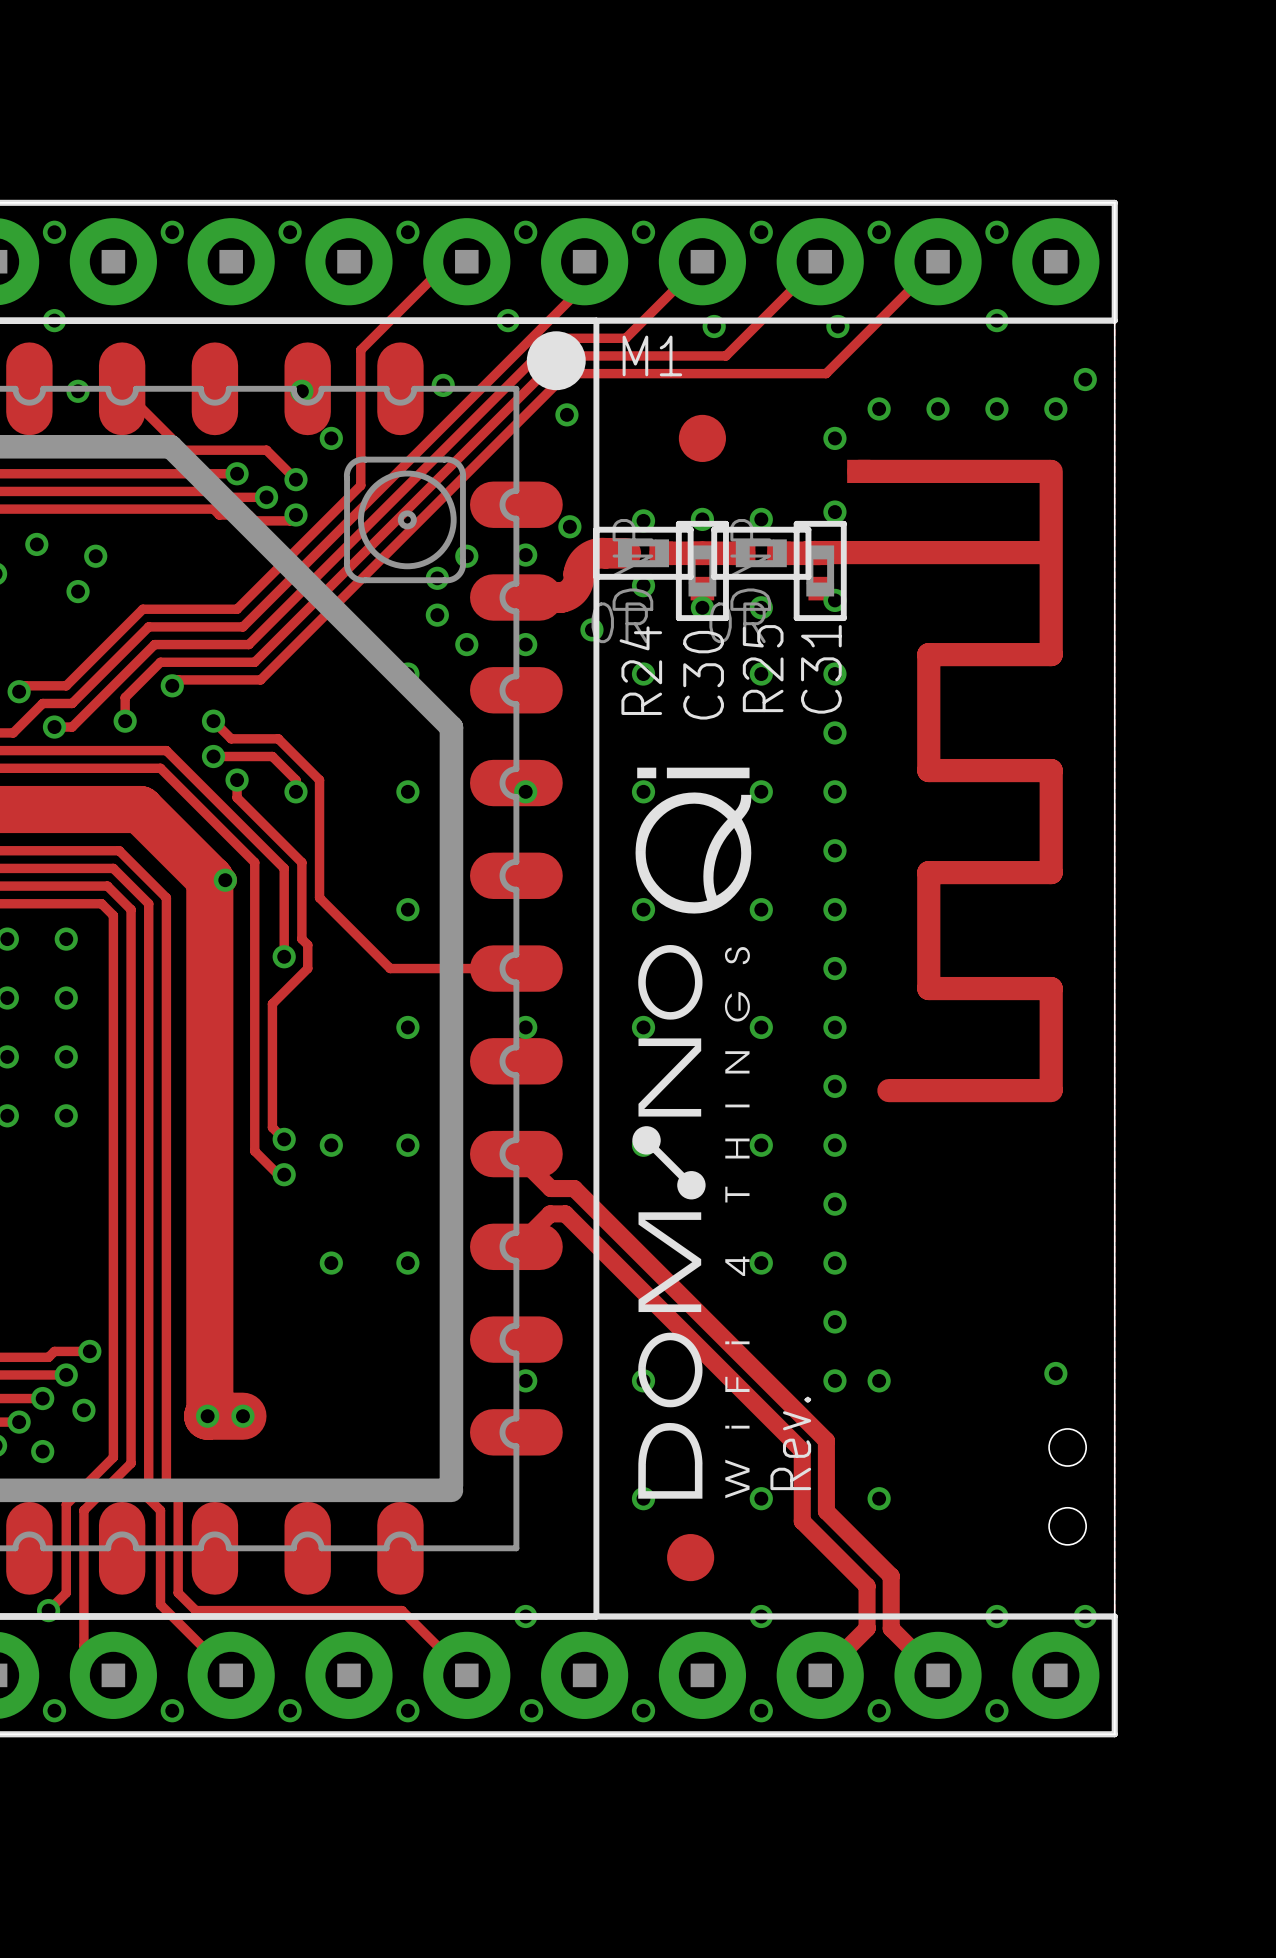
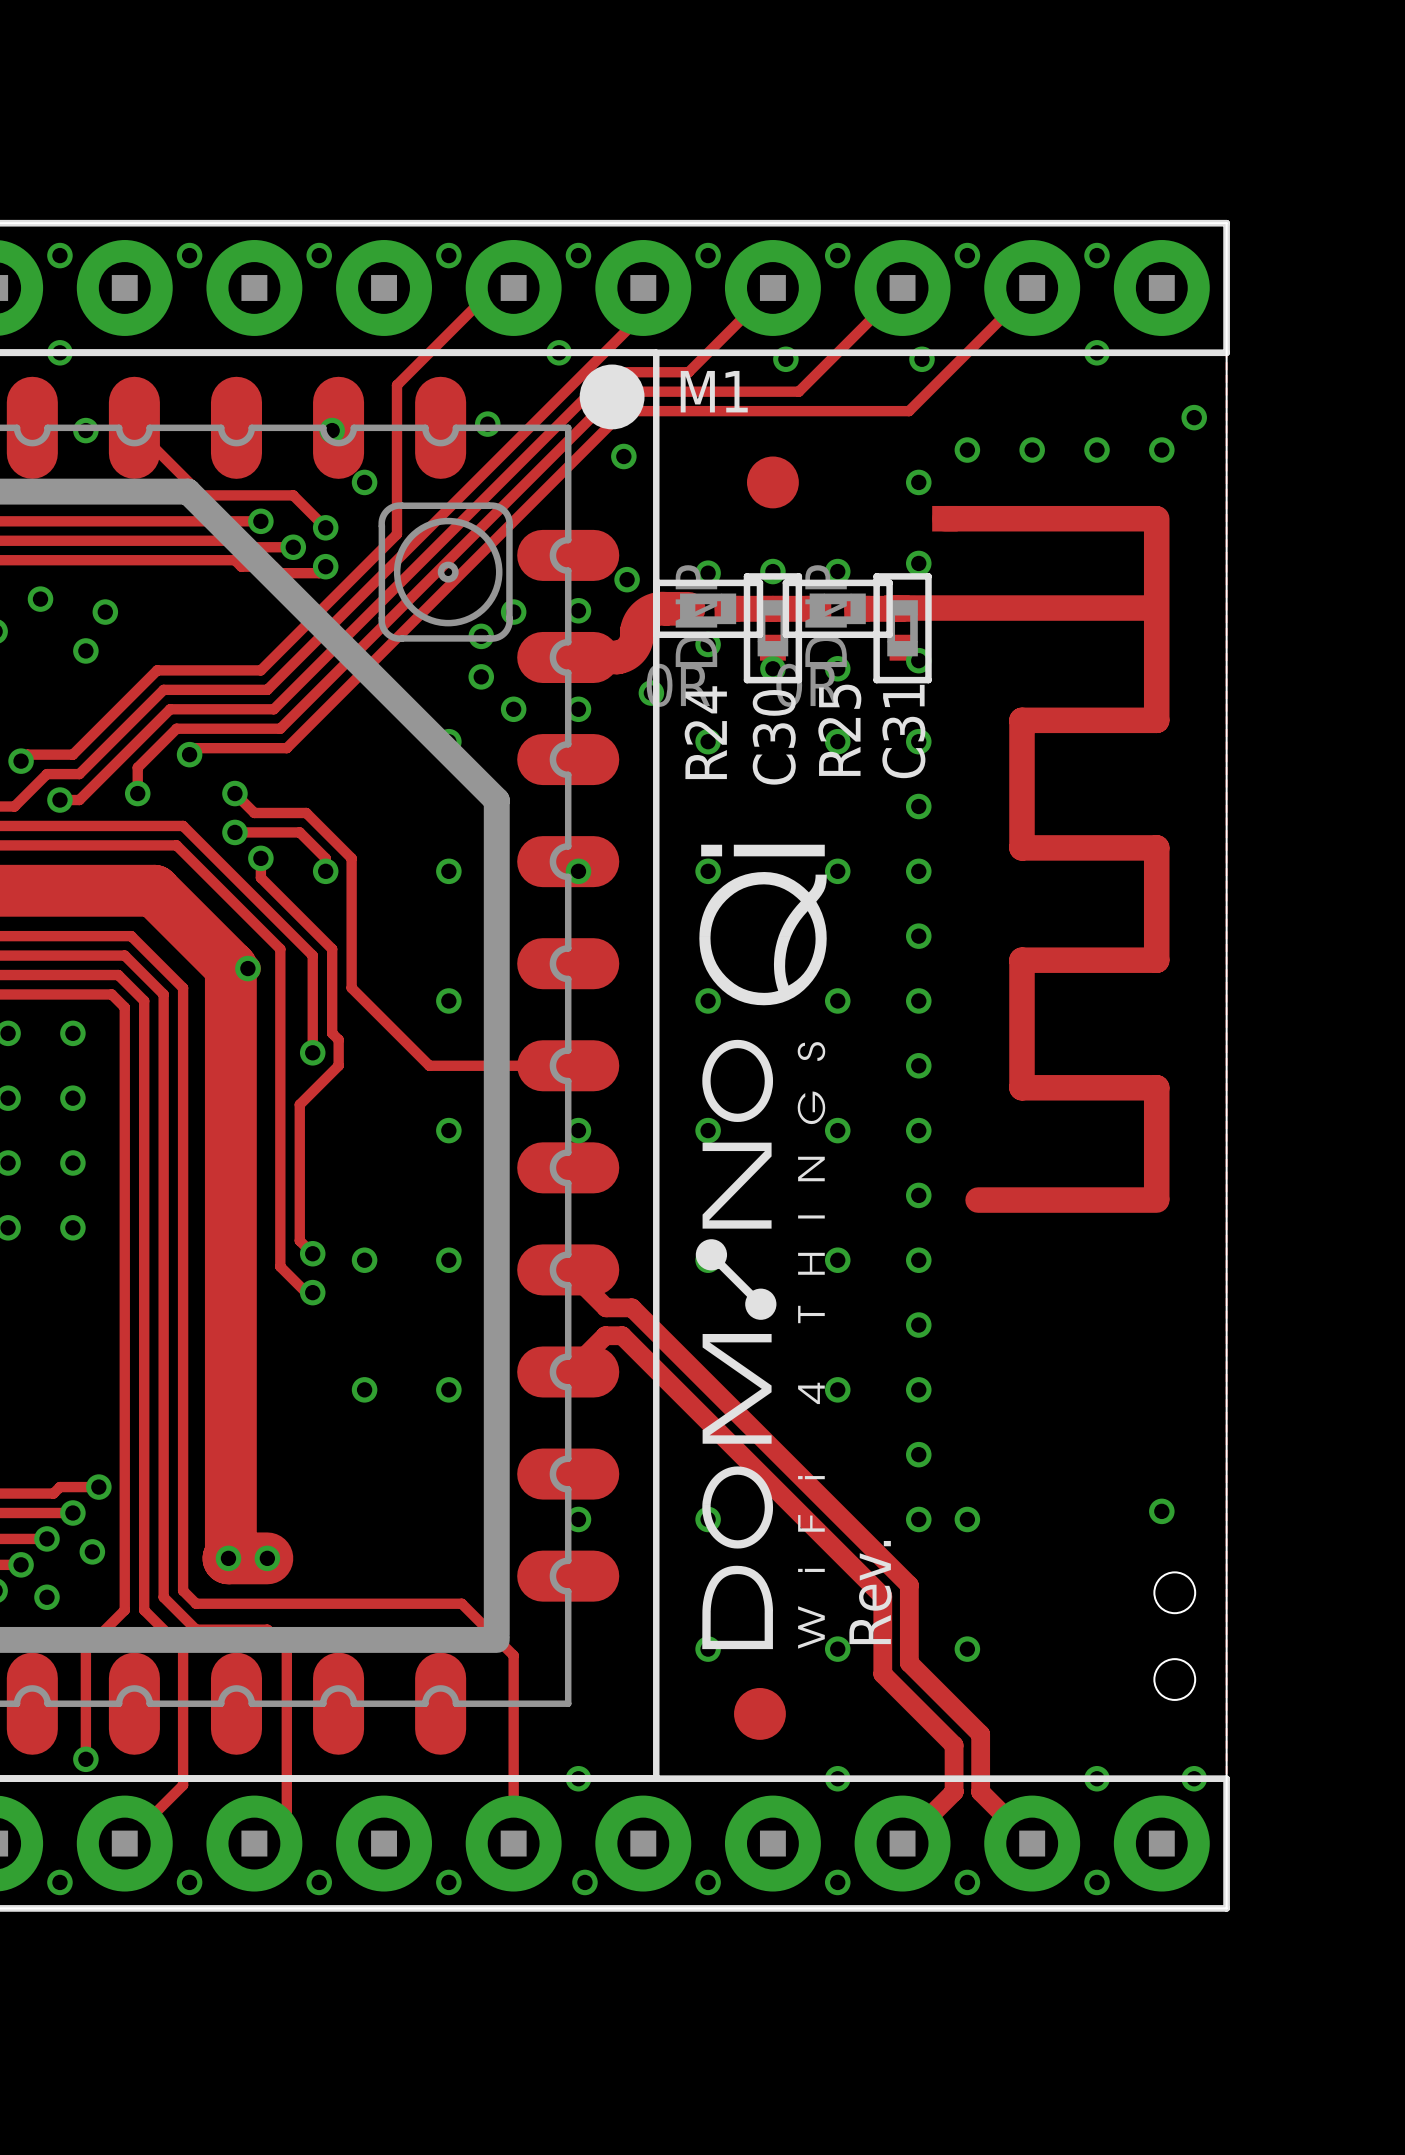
track: (166, 1445) (166, 1486) (178, 1498) (178, 1592) (195, 1610) (402, 1610) (466, 1675) -> (183, 1590) (196, 1603) (461, 1603) (513, 1655) (513, 1843)
track: (148, 1451) (148, 1498) (160, 1510) (160, 1604) (231, 1675) -> (163, 1597) (196, 1629) (267, 1629) (286, 1649) (286, 1811) (254, 1843)
track: (113, 1457) (66, 1504) (66, 1592) (48, 1610) -> (124, 1603) (124, 1610) (85, 1649) (85, 1759)
track: (131, 1463) (83, 1510) (83, 1645) (113, 1675) -> (144, 1610) (183, 1649) (183, 1785) (124, 1843)
via position: (48, 1610) -> (85, 1759)

